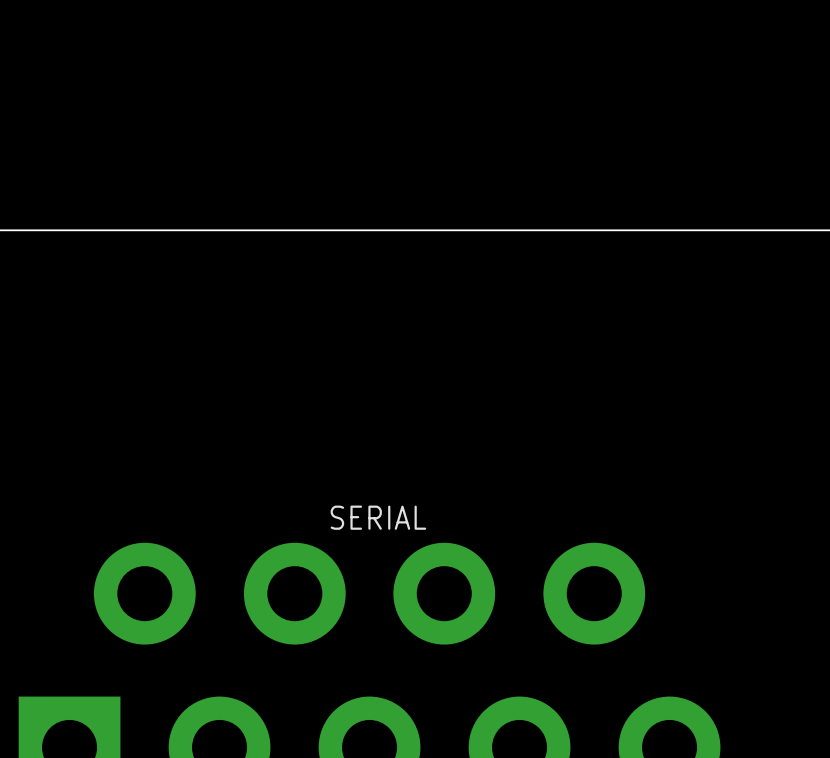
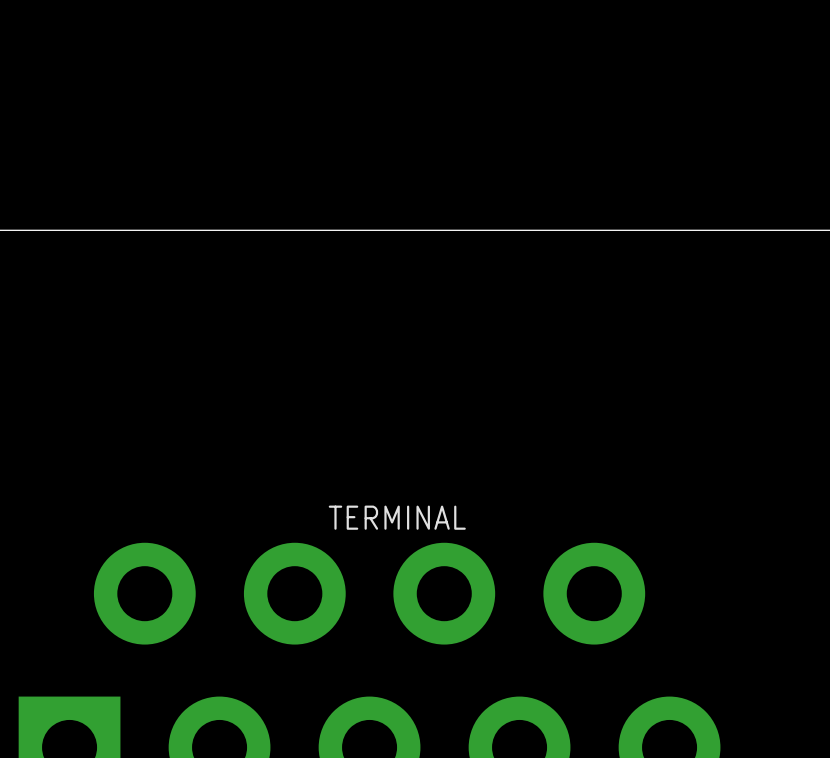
SERIAL name: SERIAL (378, 517) -> TERMINAL (397, 517)

